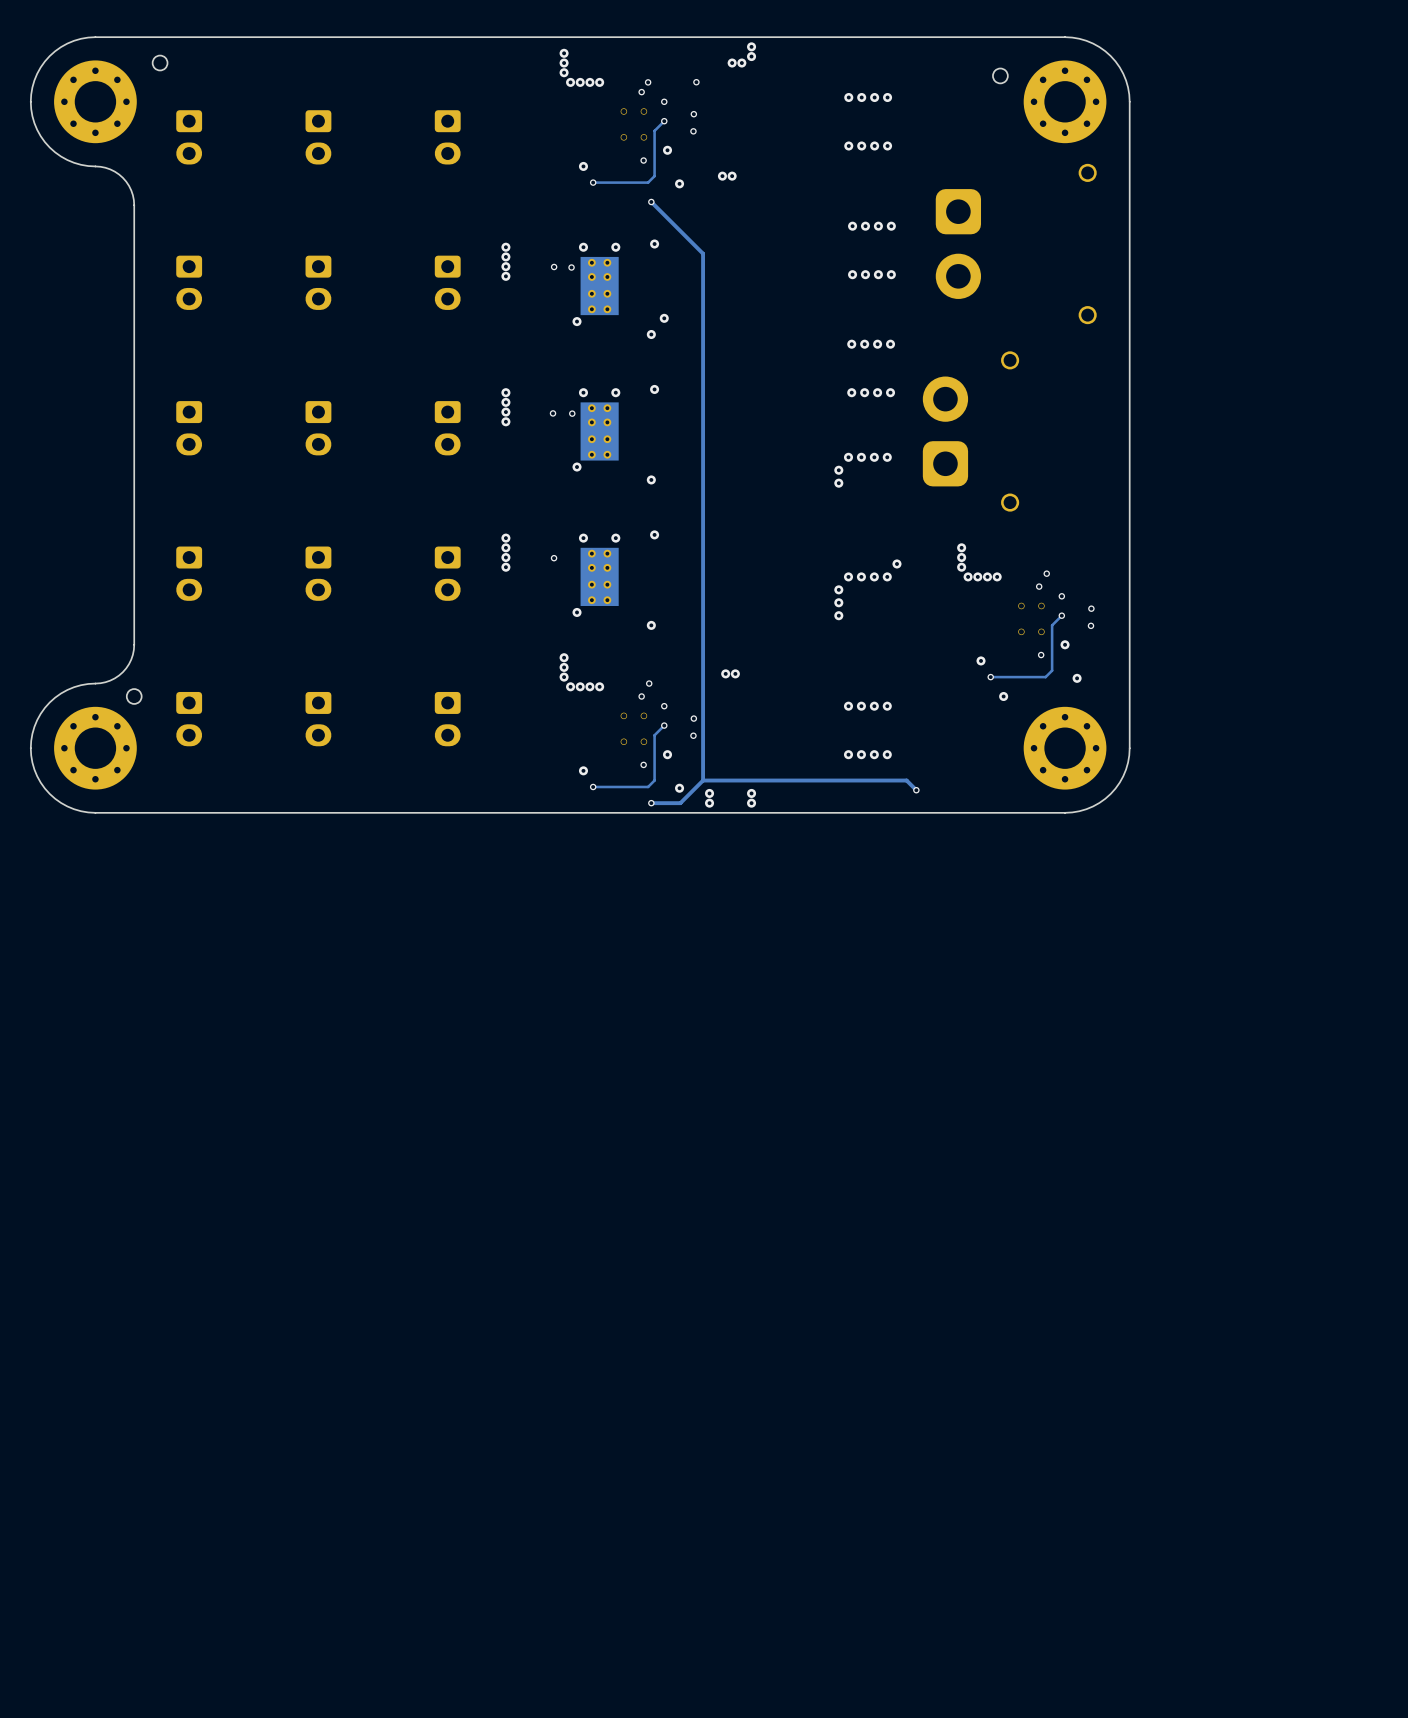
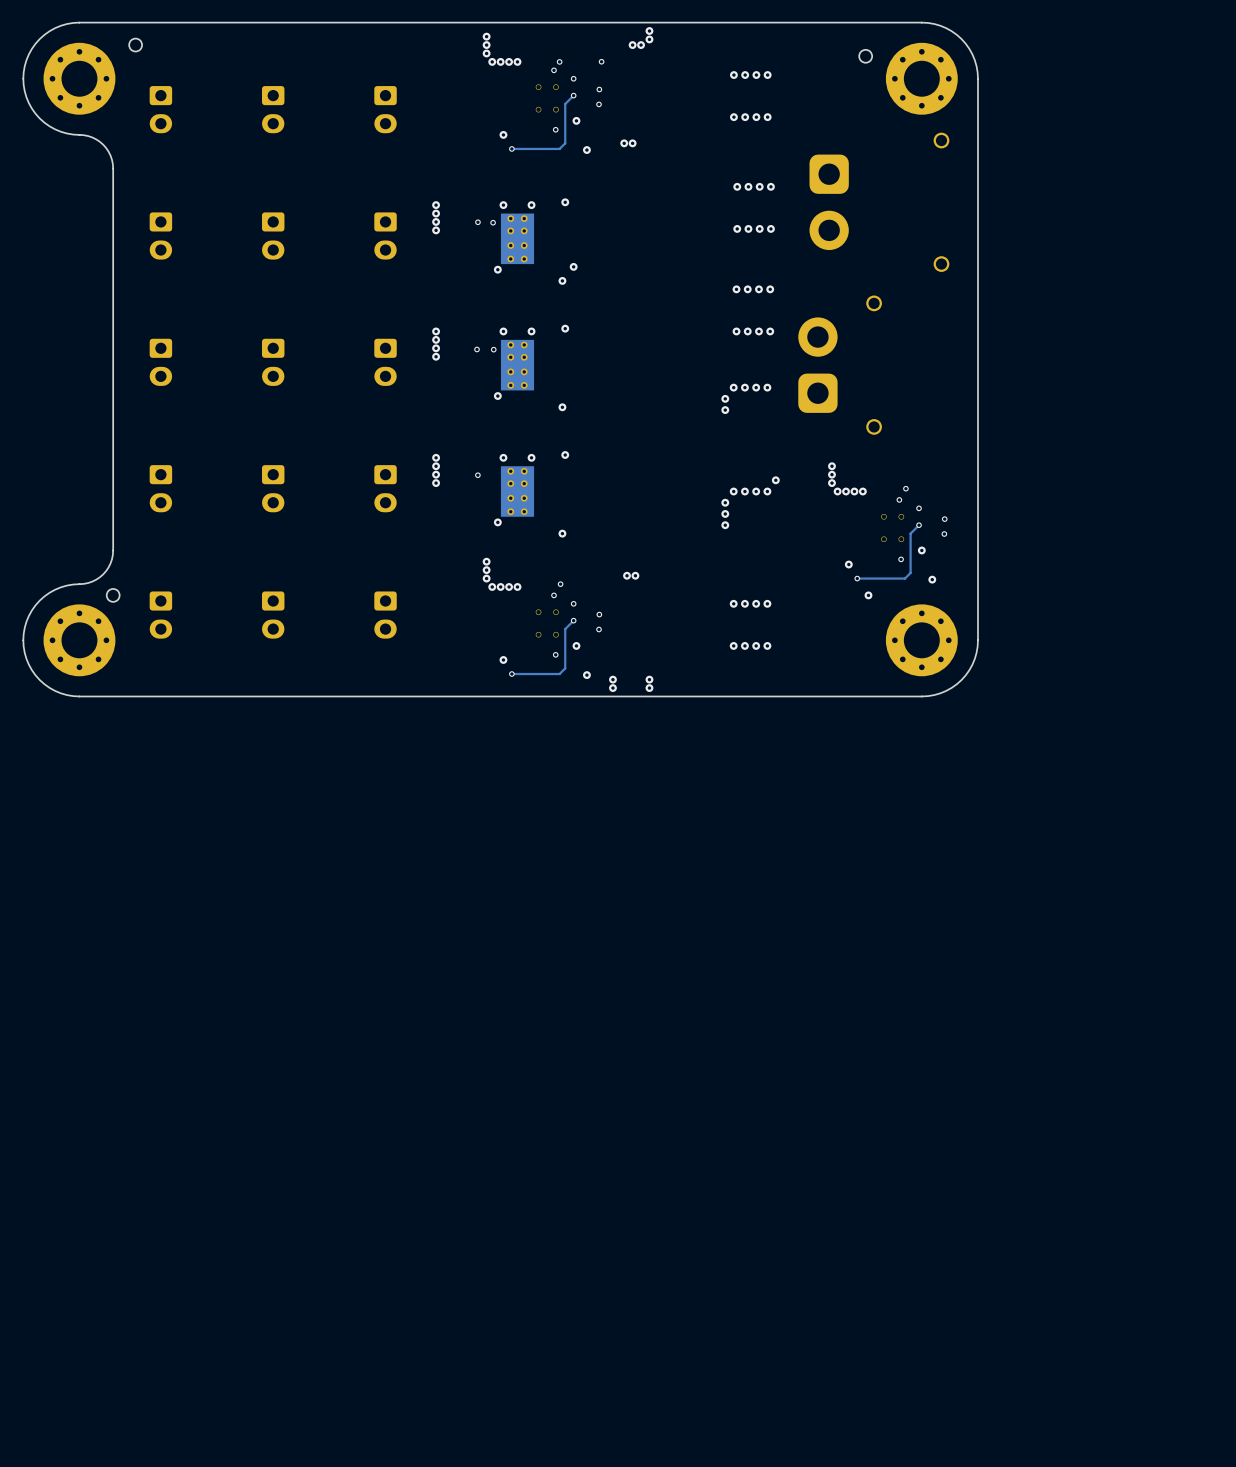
track: (651, 201) (703, 253) (703, 780) -> none
via: (651, 201) -> none
track: (703, 780) (906, 780) (916, 790) -> none
track: (703, 780) (680, 803) (651, 803) -> none
via: (916, 790) -> none
via: (651, 803) -> none

